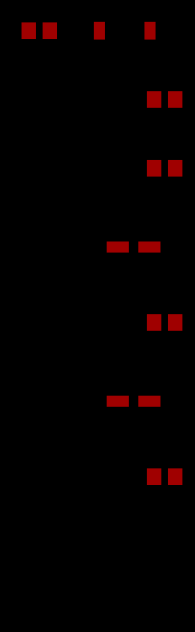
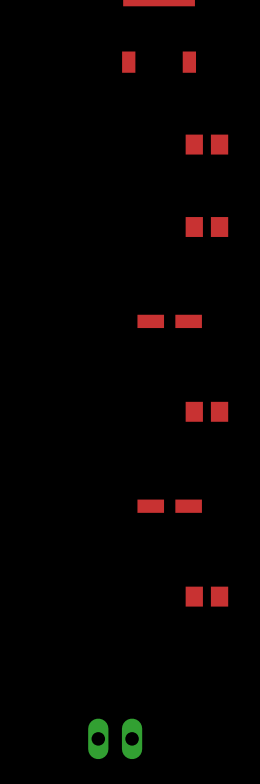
part: (39, 30) -> none
part: none -> (115, 738)

